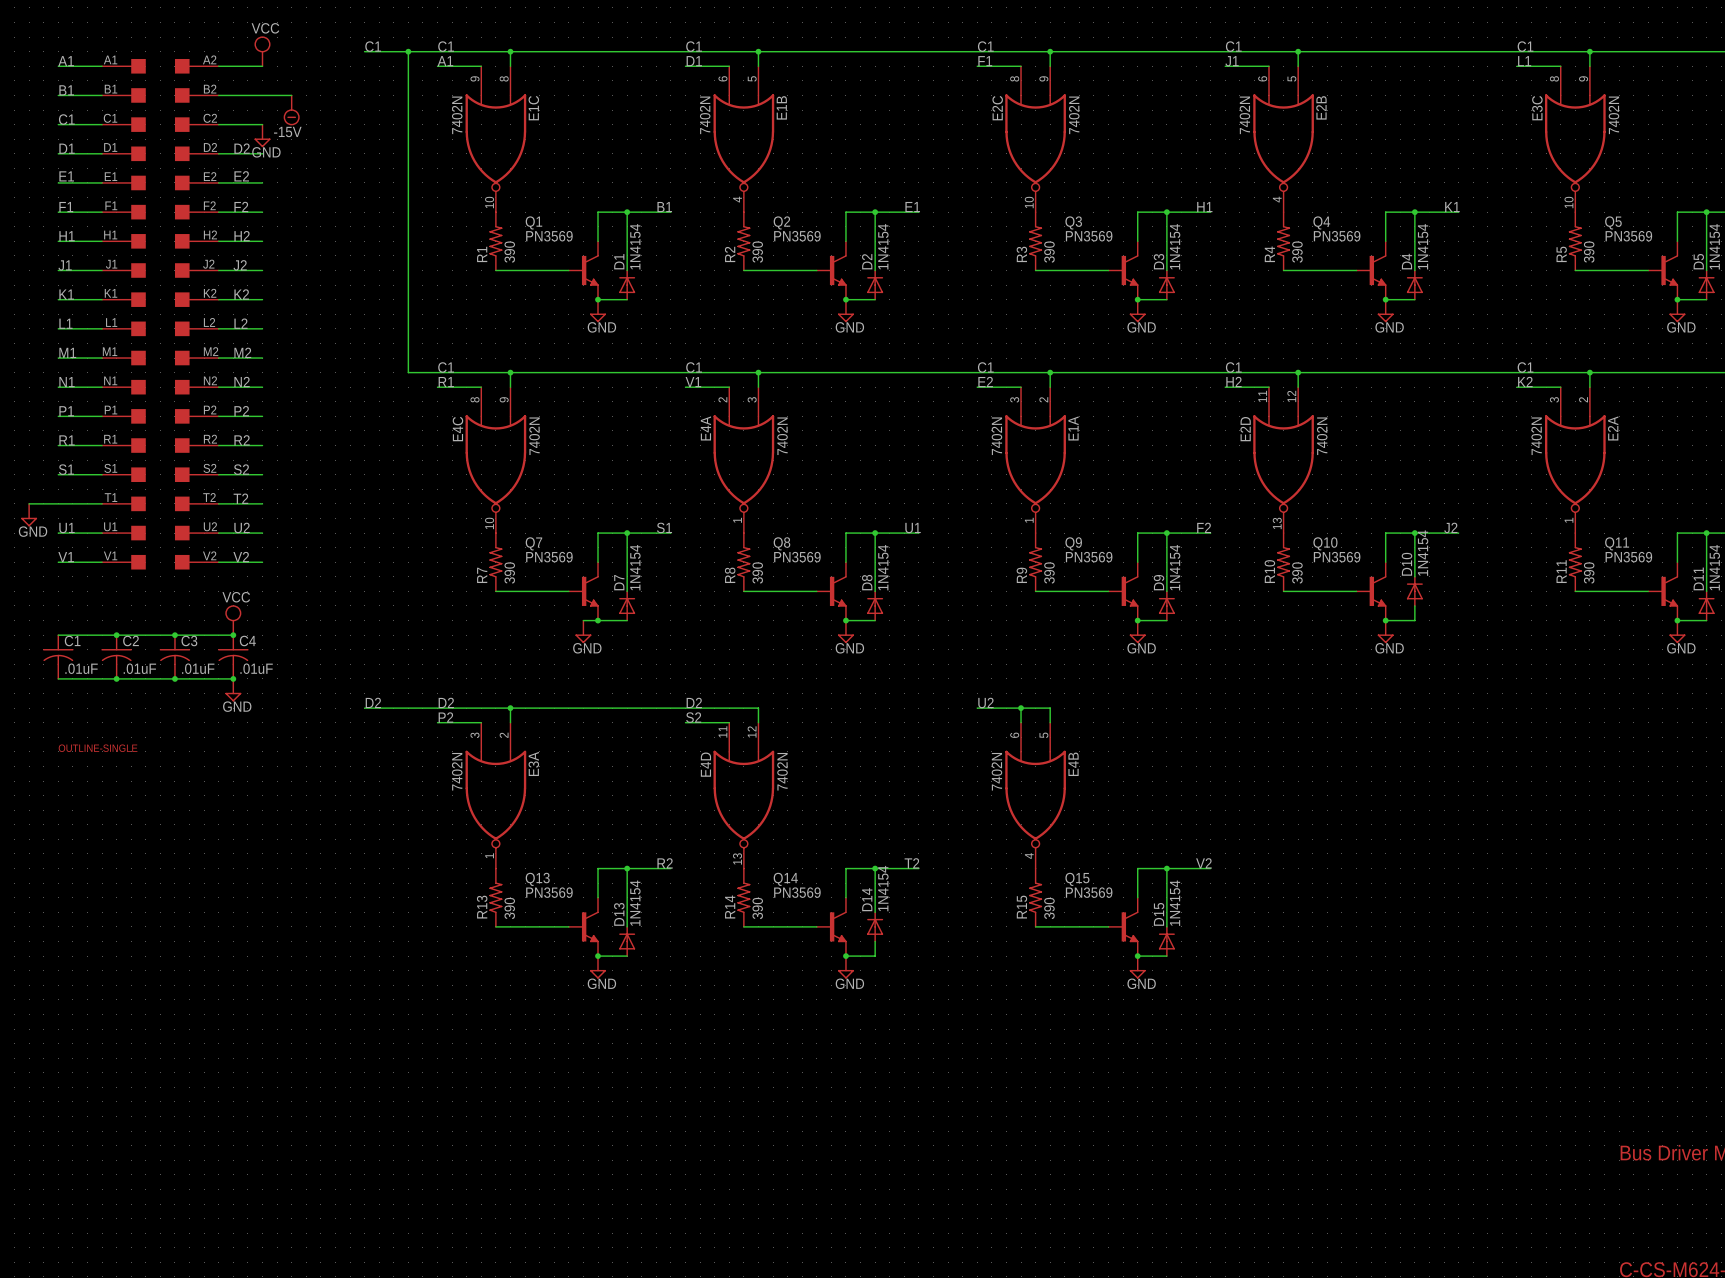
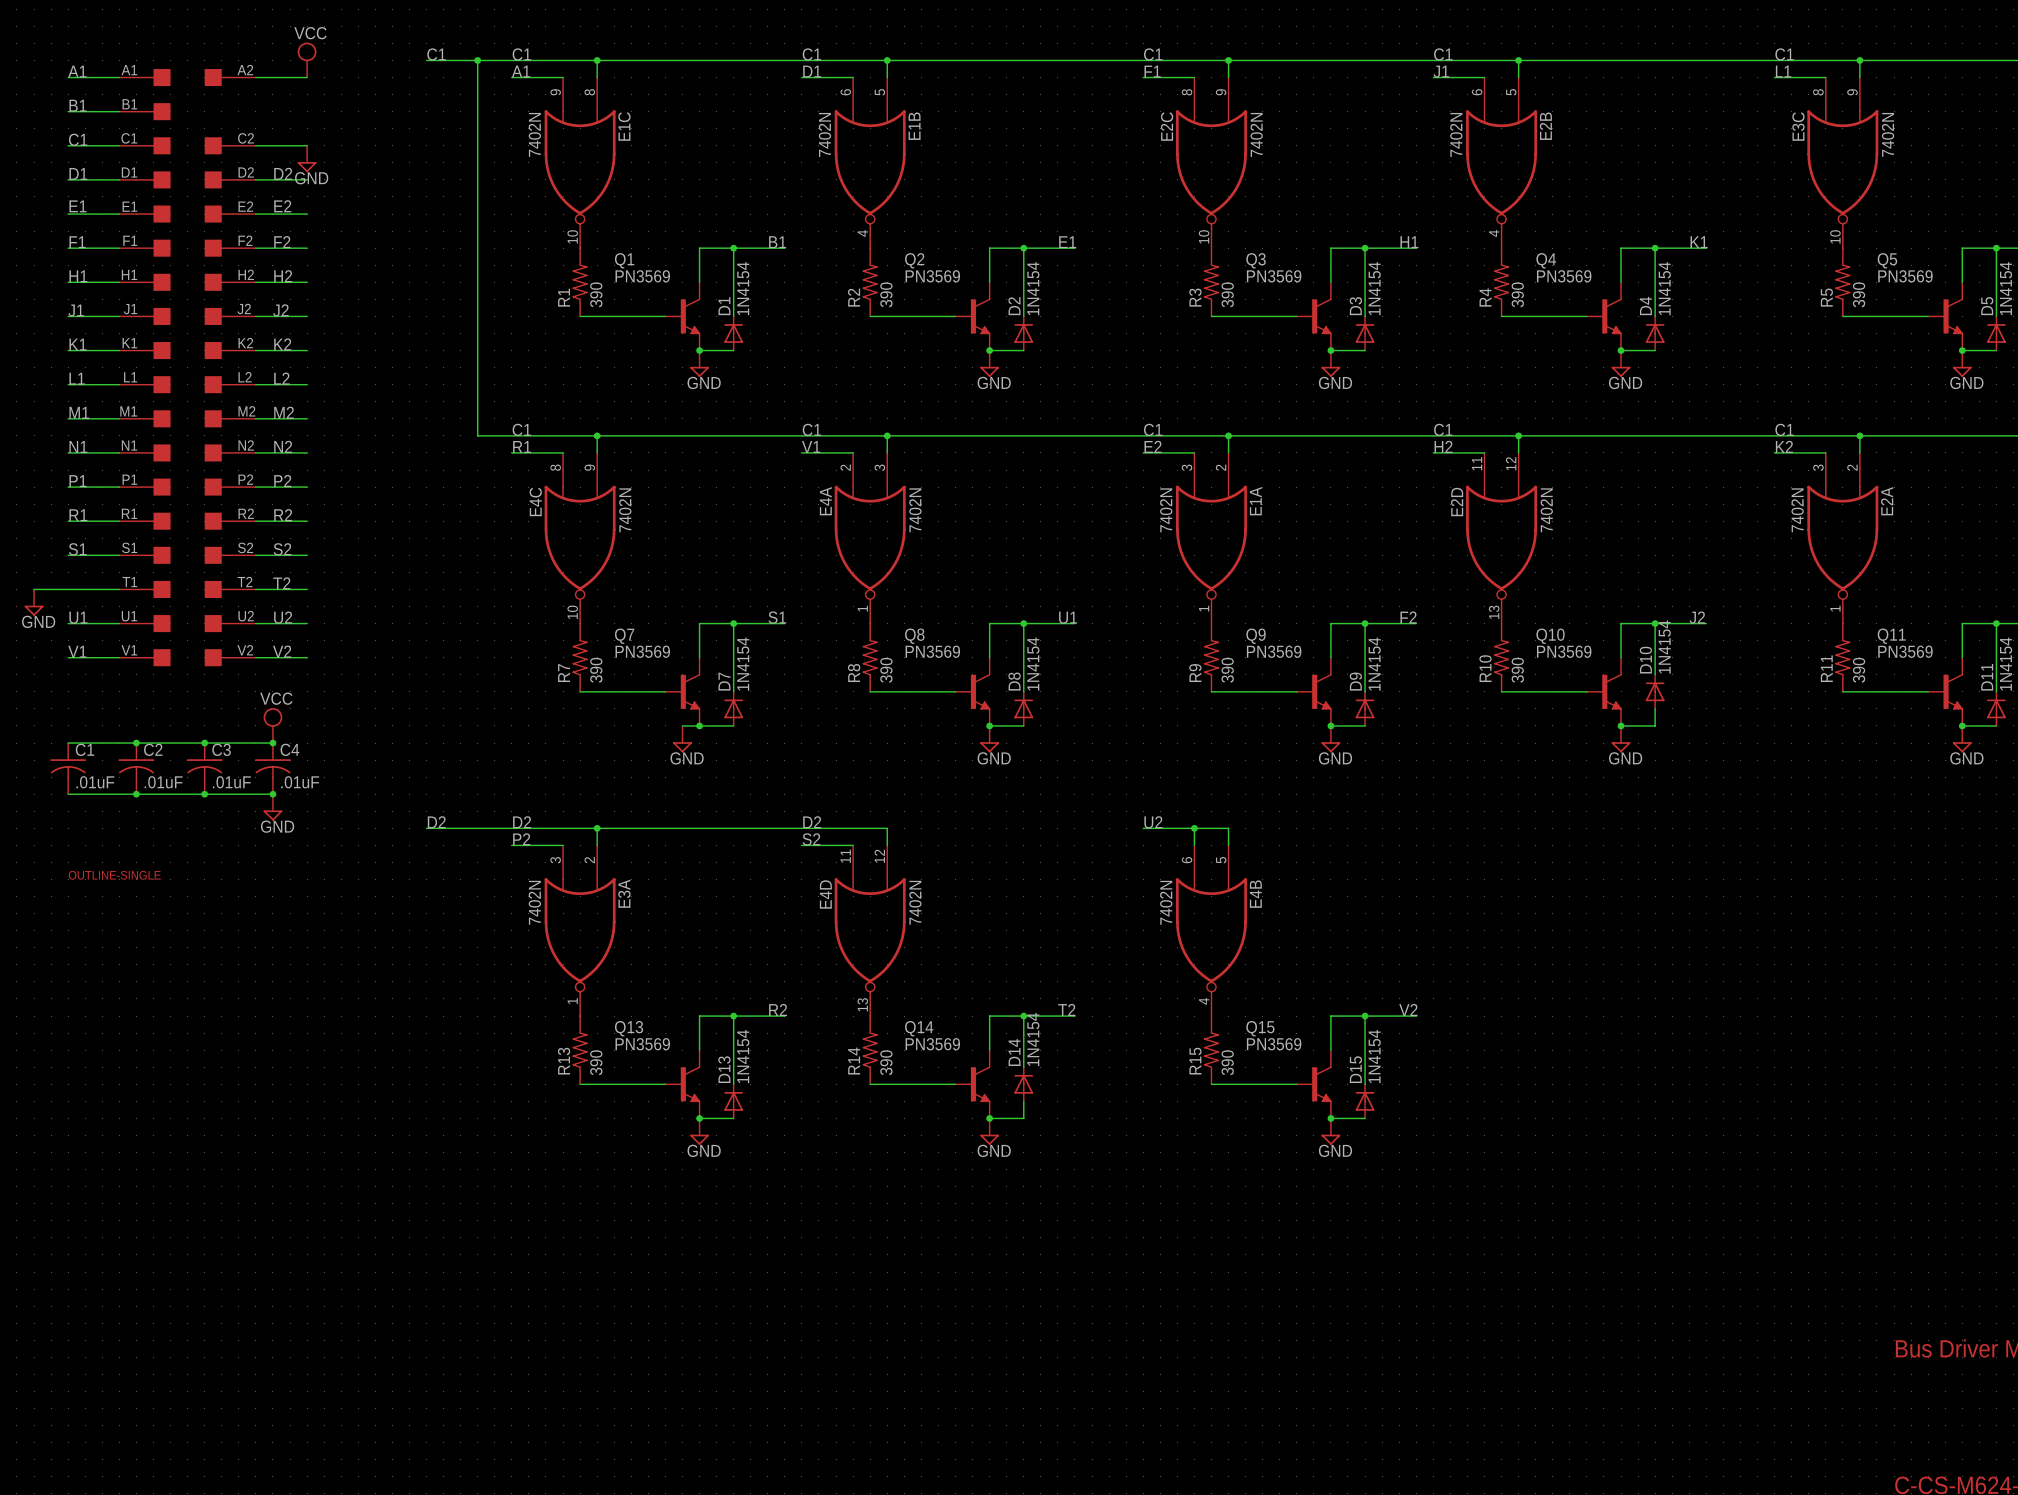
part: (196, 95) -> none
wire: (218, 95) (291, 95) -> none
power symbol: -15V (291, 110) -> none

